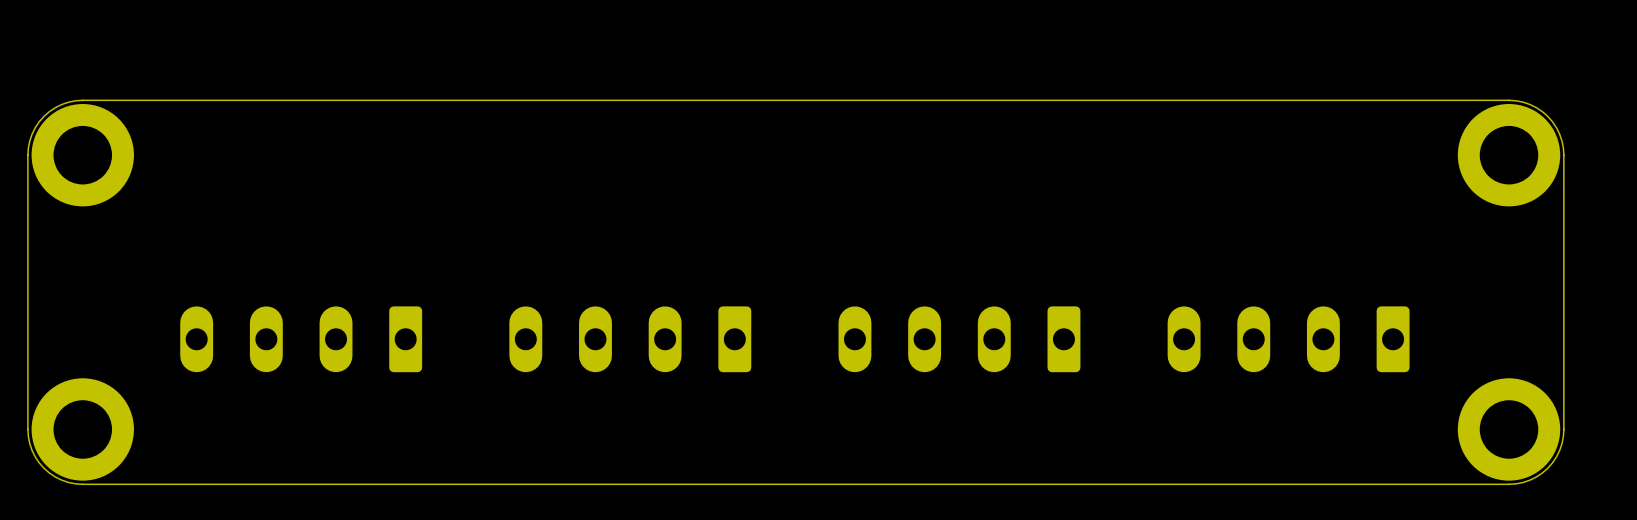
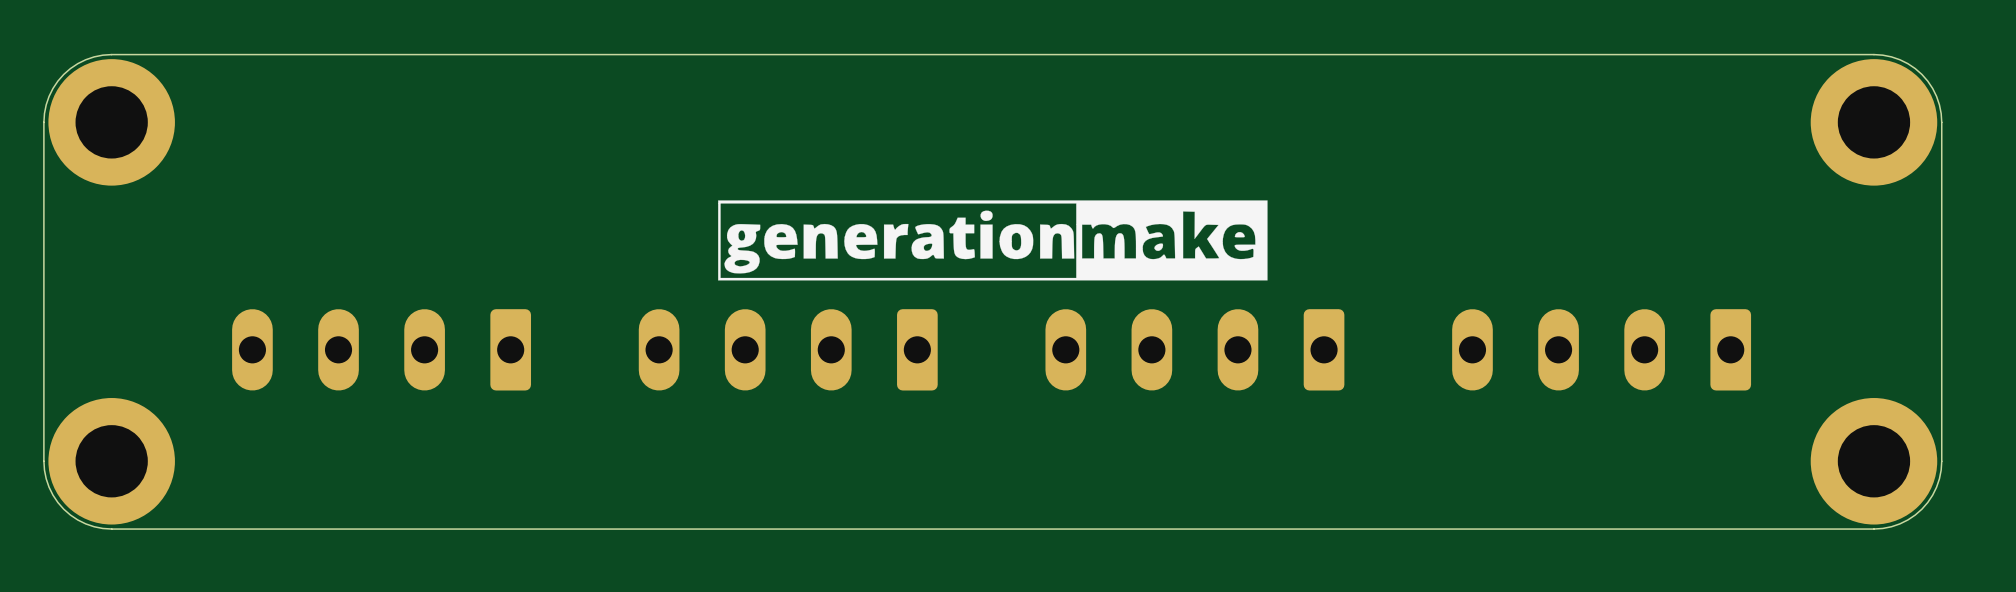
drawing: none -> [718, 200, 1268, 281]

